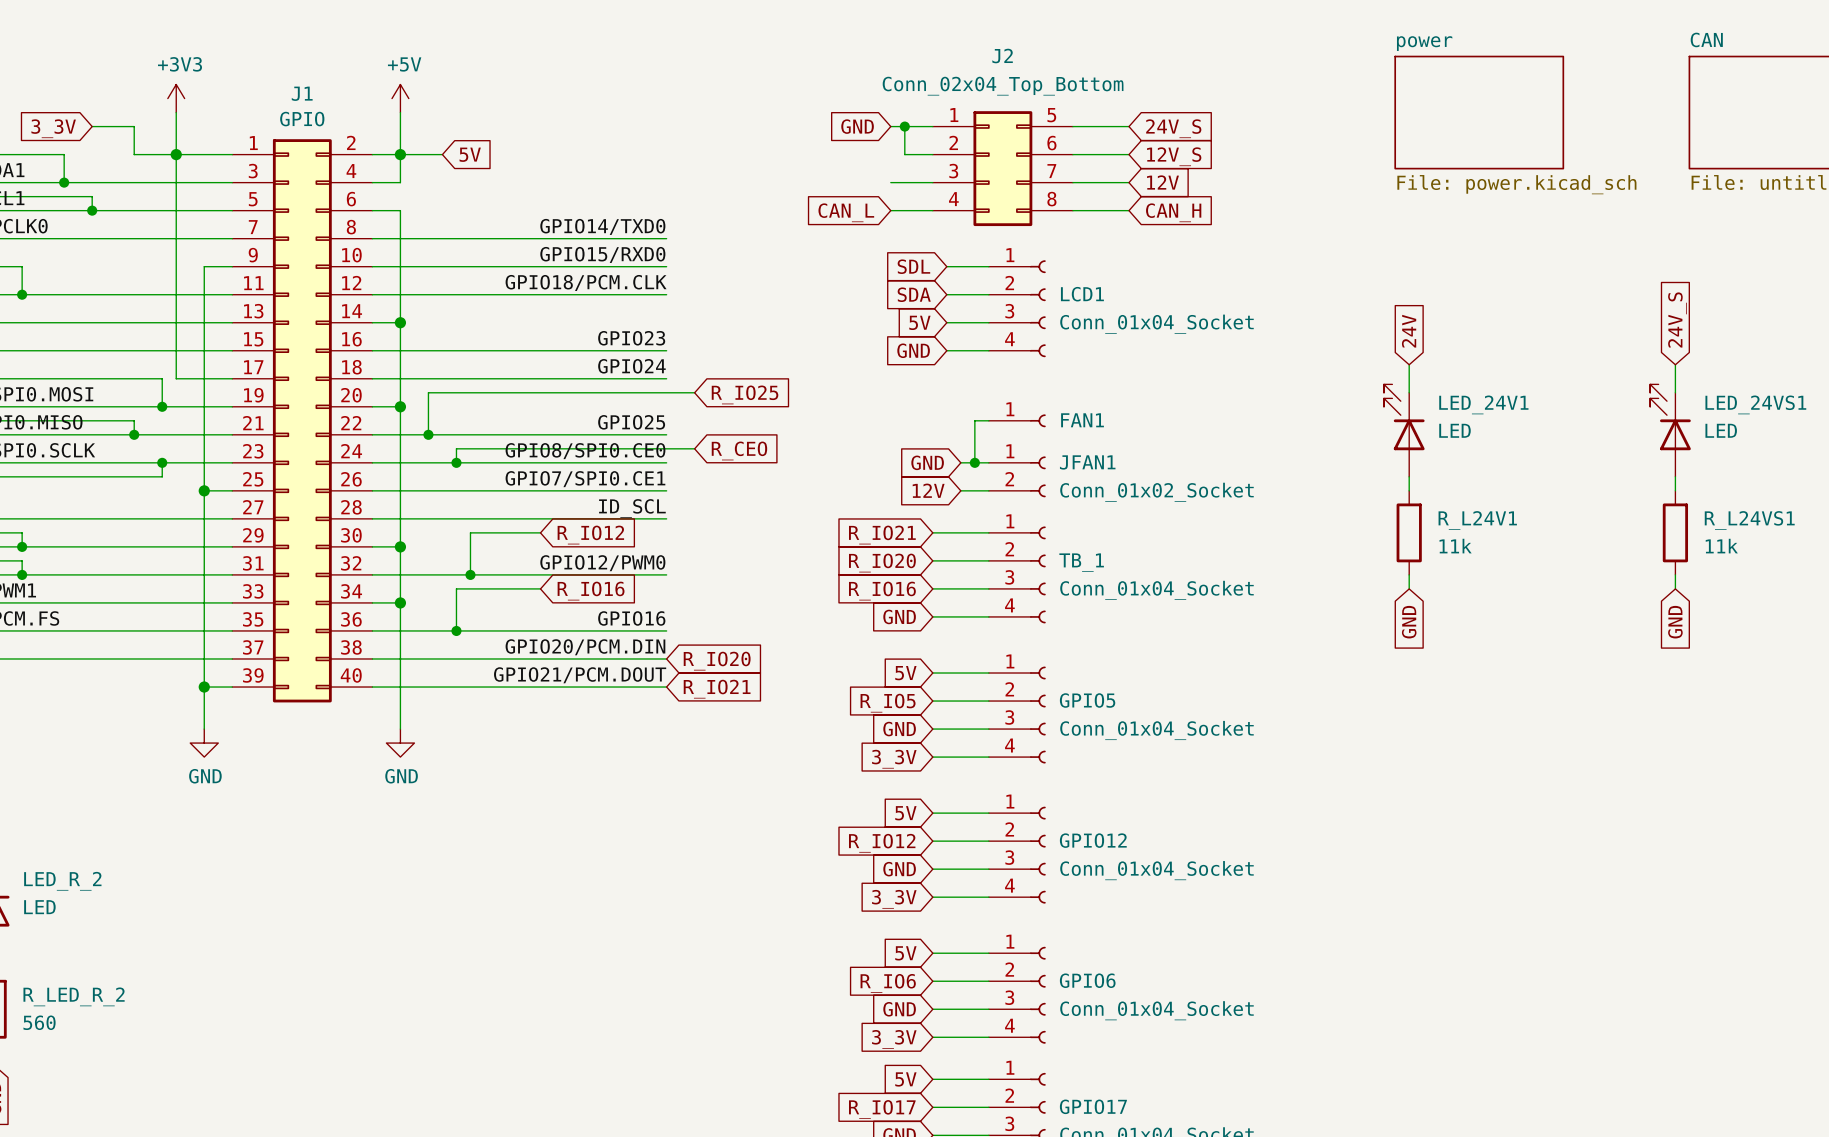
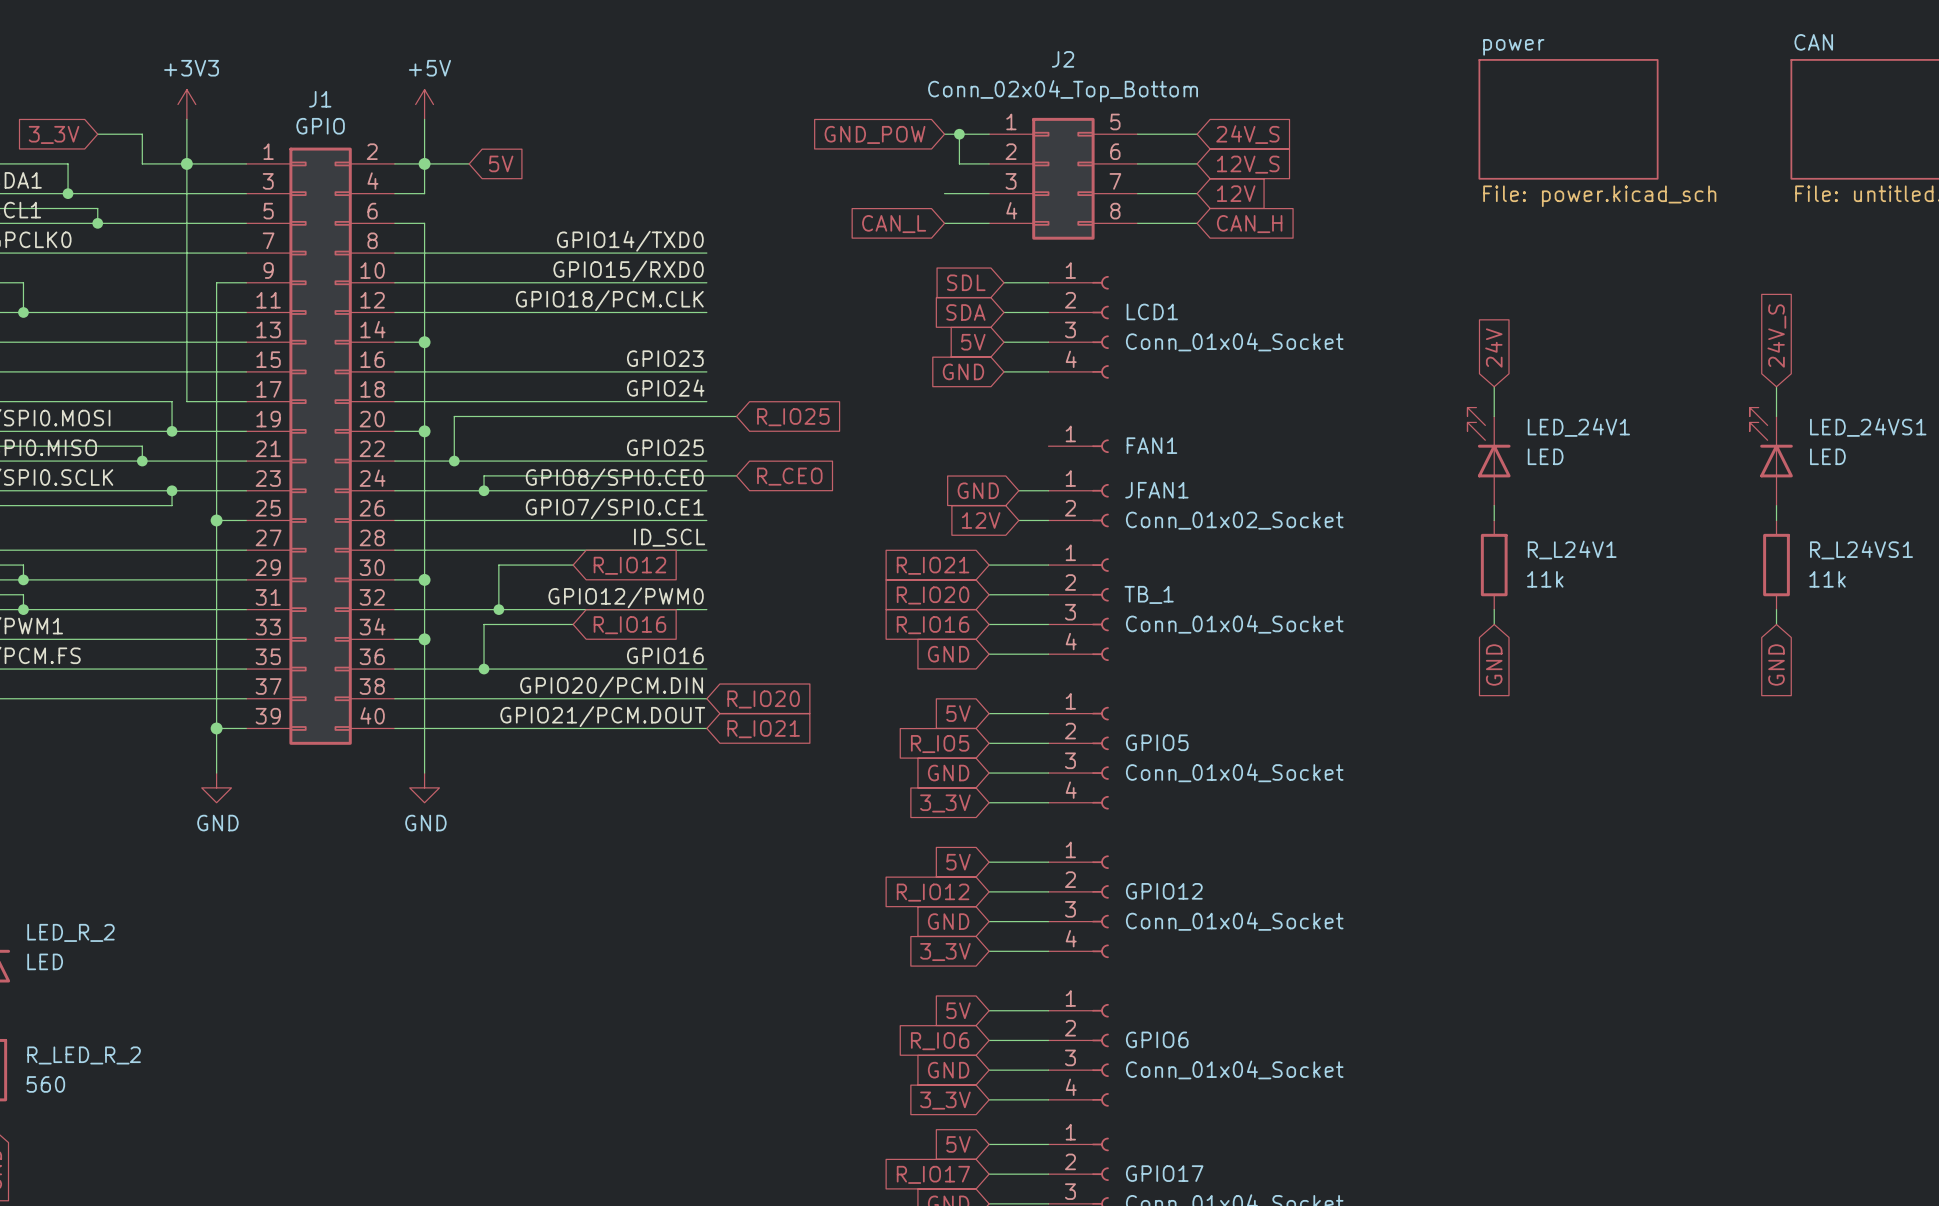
global label: GND (857, 126) -> GND_POW (875, 134)
wire: (988, 420) (974, 420) (974, 462) -> none
junction: (974, 462) -> none

